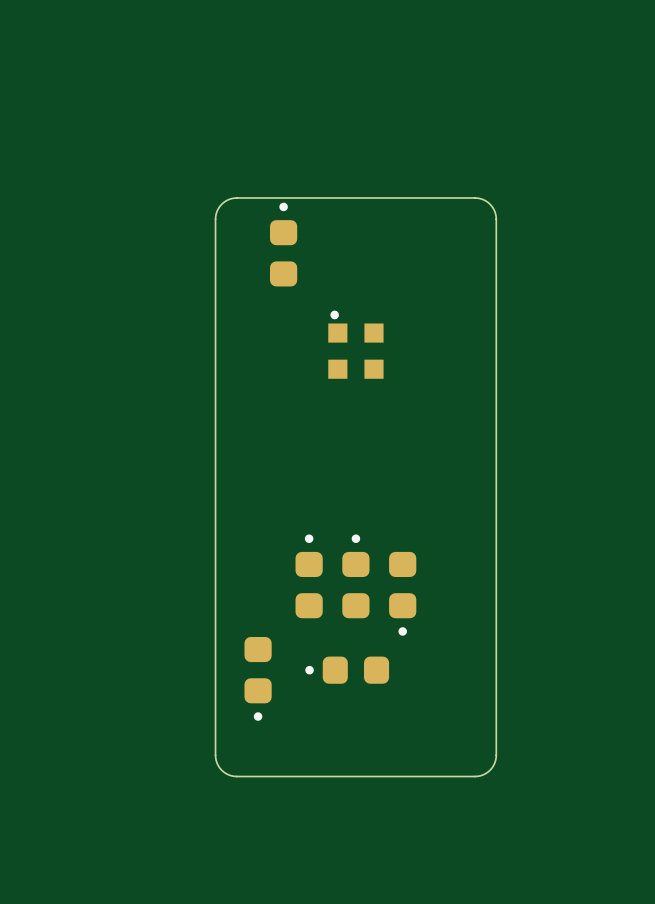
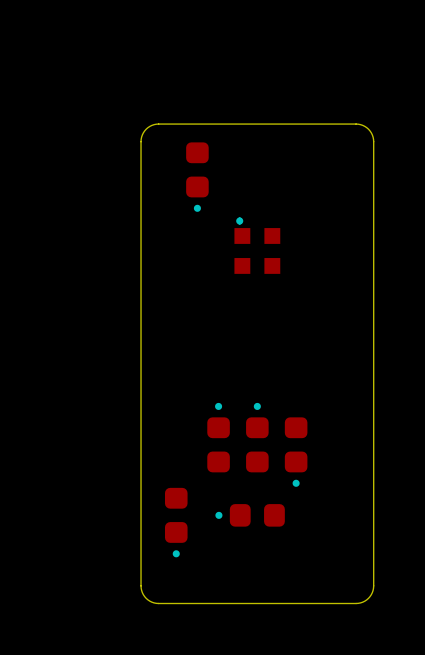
part rotation: 0° (283, 244) -> 180° (197, 177)

